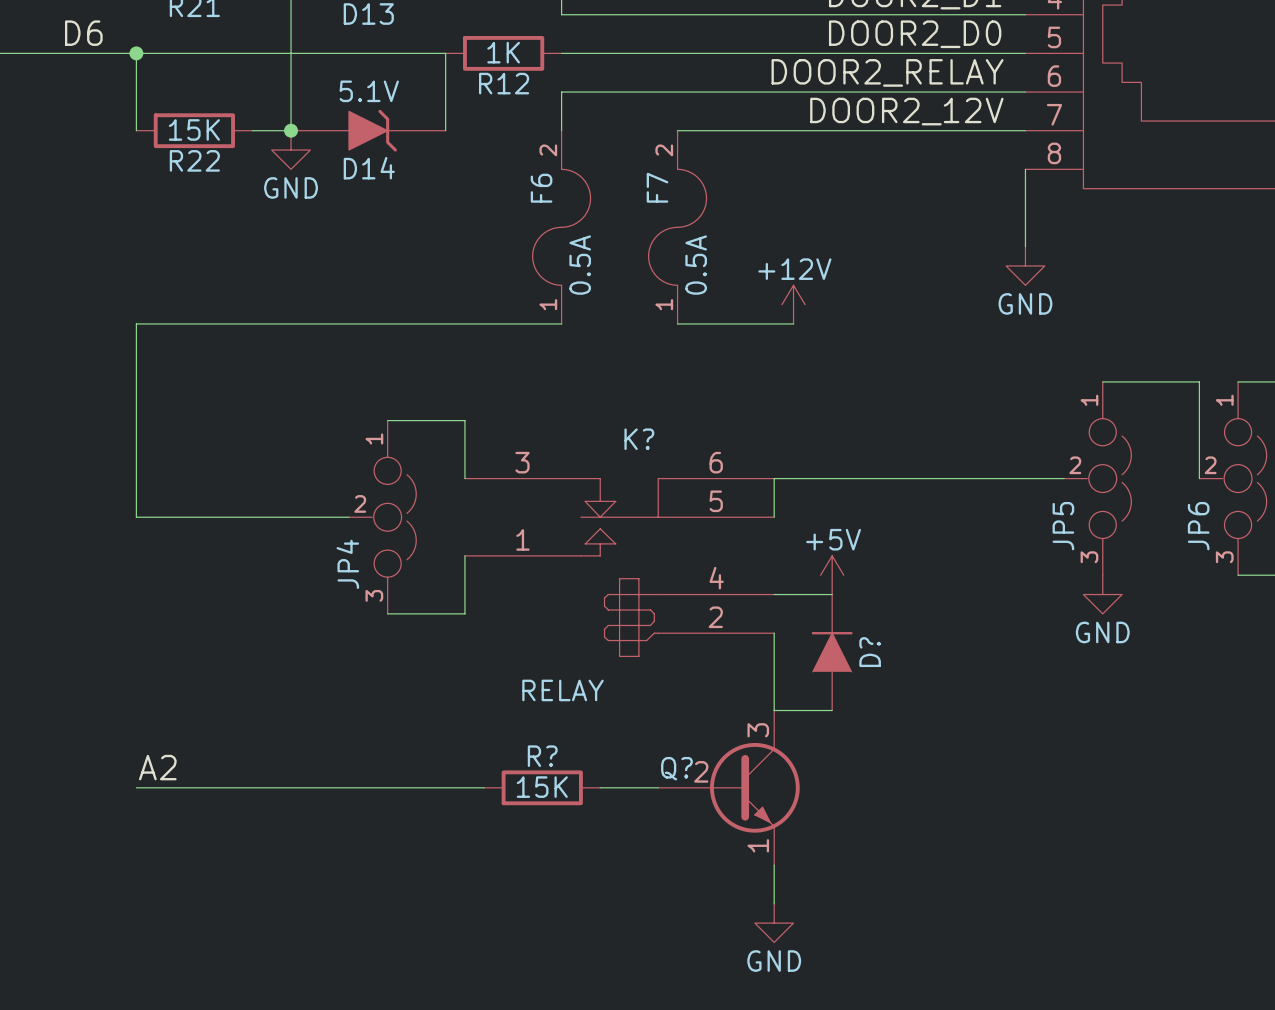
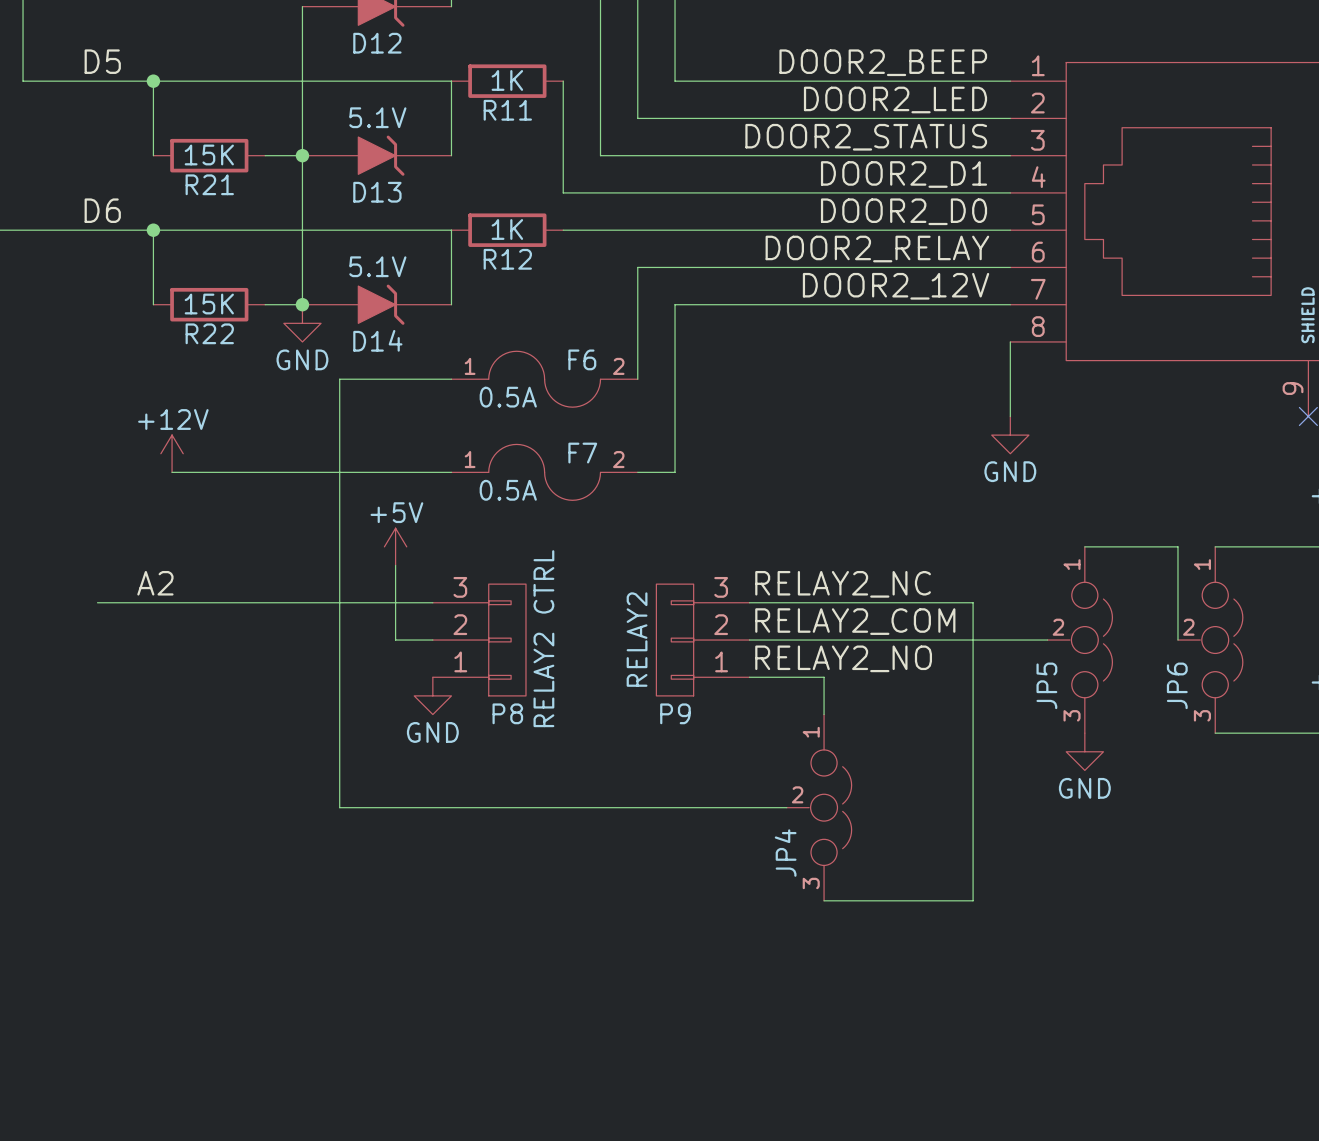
wire: (638, 92) (561, 92) (561, 130) -> (637, 267) (637, 379)
wire: none -> (675, 304) (675, 472) (637, 472)
wire: none -> (451, 379) (339, 379) (339, 807) (786, 807)
F6 rotation: 0° (561, 227) -> 90° clockwise (544, 379)
F7 rotation: 0° (677, 227) -> 90° clockwise (544, 472)
F7 position: (677, 227) -> (544, 472)
power symbol: none -> +12V (172, 453)
wire: none -> (172, 472) (451, 472)
power symbol: +12V (793, 304) -> none
wire: (561, 323) (136, 323) (136, 517) (349, 517) -> none
wire: (677, 323) (793, 323) -> none
power symbol: none -> +5V (395, 546)
wire: none -> (395, 565) (395, 640) (432, 640)
wire: (387, 420) (464, 420) (464, 478) -> none
label: none -> RELAY2_NC (843, 584)
wire: none -> (749, 602) (973, 602) (973, 900) (824, 900)
label: none -> RELAY2_COM (855, 621)
P8: none -> RELAY2 CTRL (479, 640)
P9: none -> RELAY2 (702, 640)
label: none -> RELAY2_NO (843, 658)
JP4 position: (382, 517) -> (819, 807)
wire: none -> (749, 677) (824, 677) (824, 714)
power symbol: none -> GND (432, 695)
wire: (464, 555) (464, 613) (387, 613) -> none
K?: RELAY (619, 567) -> none
power symbol: +5V (832, 575) -> none
wire: (774, 594) (832, 594) -> none
wire: (774, 633) (774, 710) (832, 710) -> none
D?: (832, 652) -> none
label position: A2 (157, 767) -> A2 (155, 583)
wire: (136, 787) (484, 787) -> (97, 602) (432, 602)
R?: 15K (542, 787) -> none
wire: (600, 787) (658, 787) -> none
Q?: (728, 787) -> none
wire: (774, 865) (774, 903) -> none
power symbol: GND (774, 923) -> none

